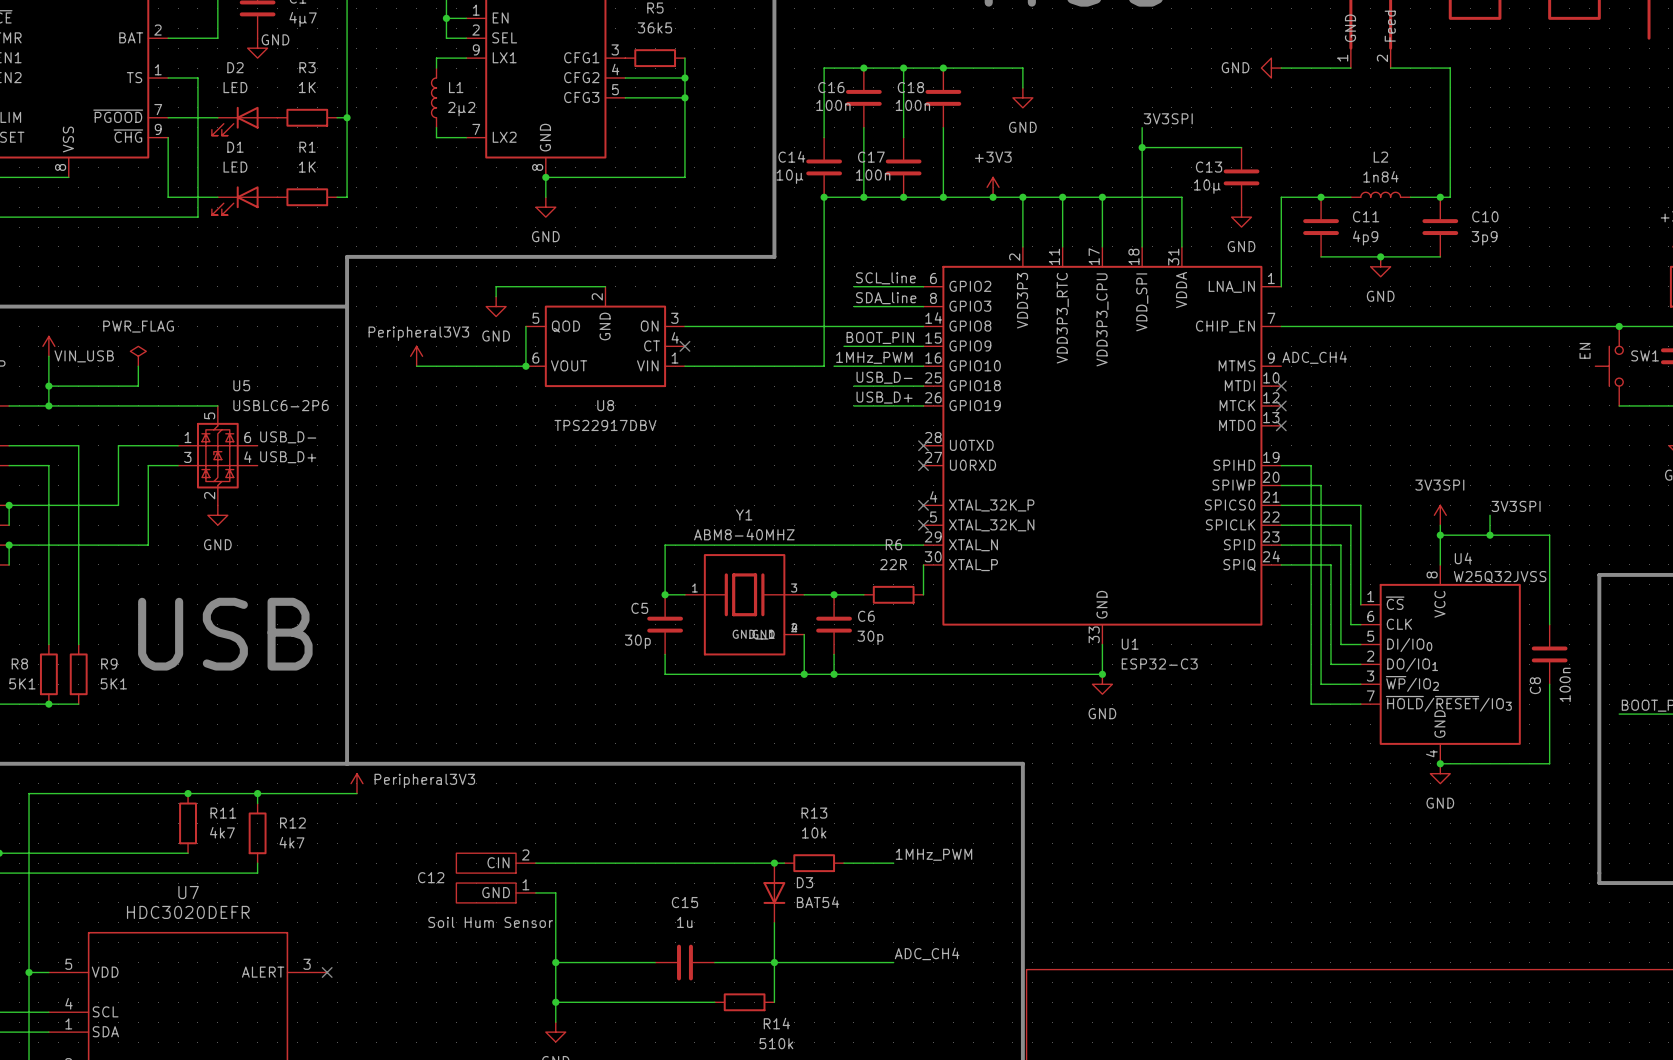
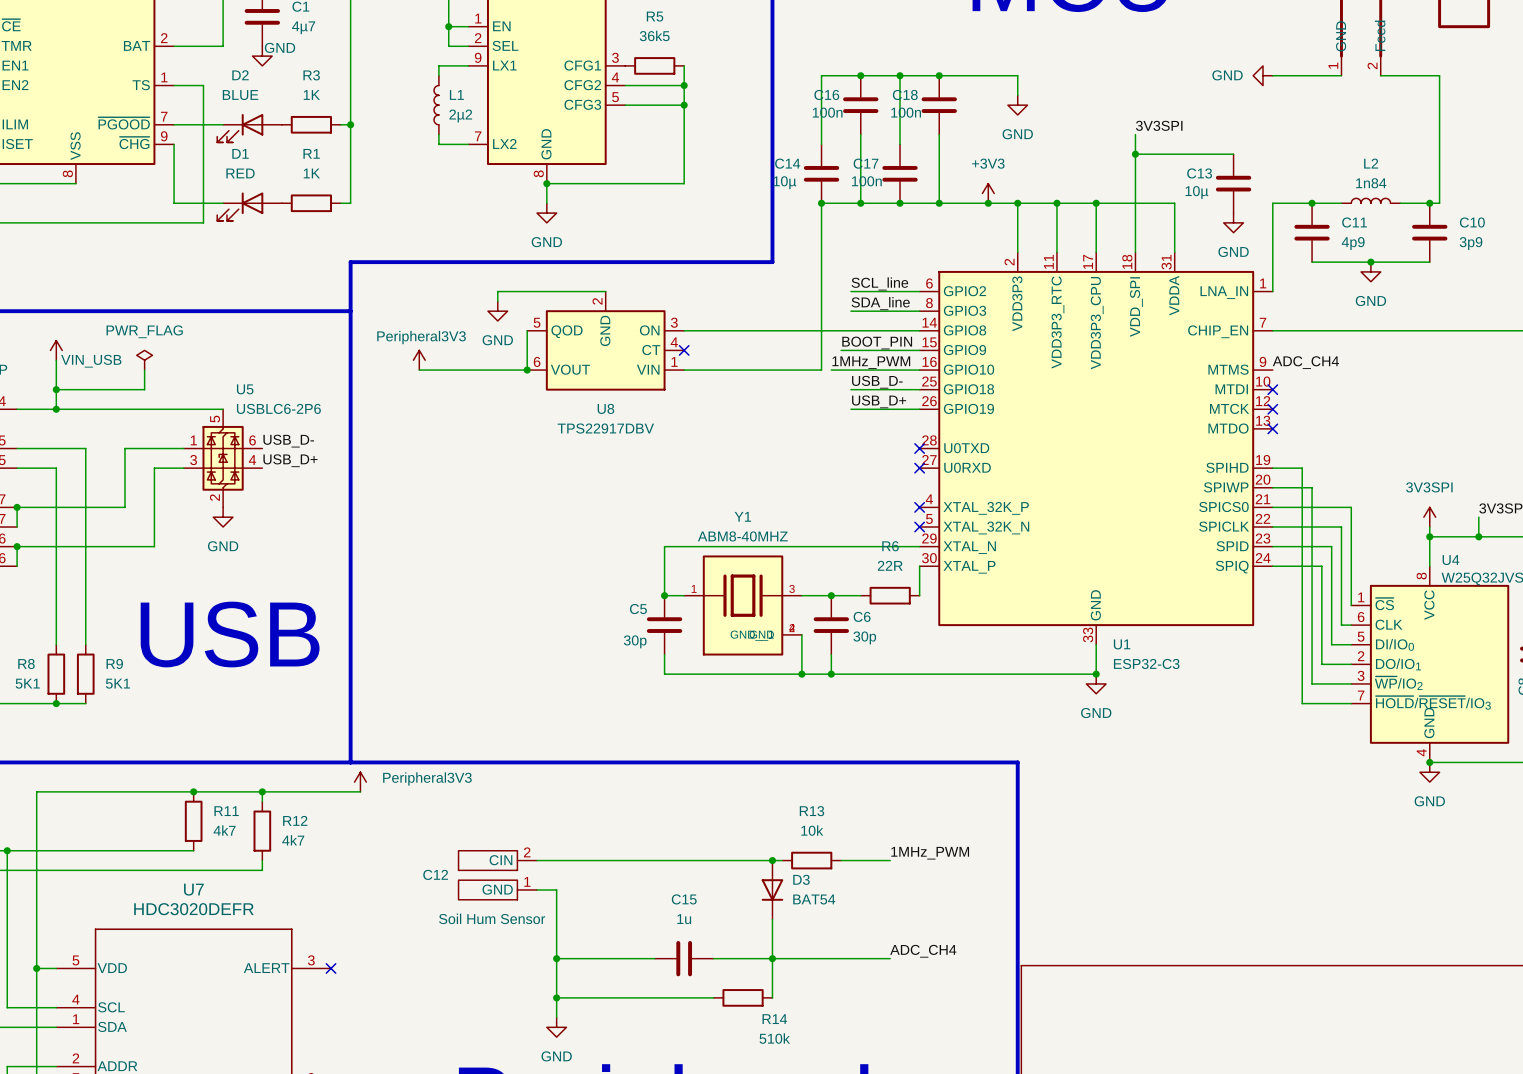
D2 value: LED (235, 87) -> BLUE (240, 95)
D1 value: LED (235, 167) -> RED (240, 173)

